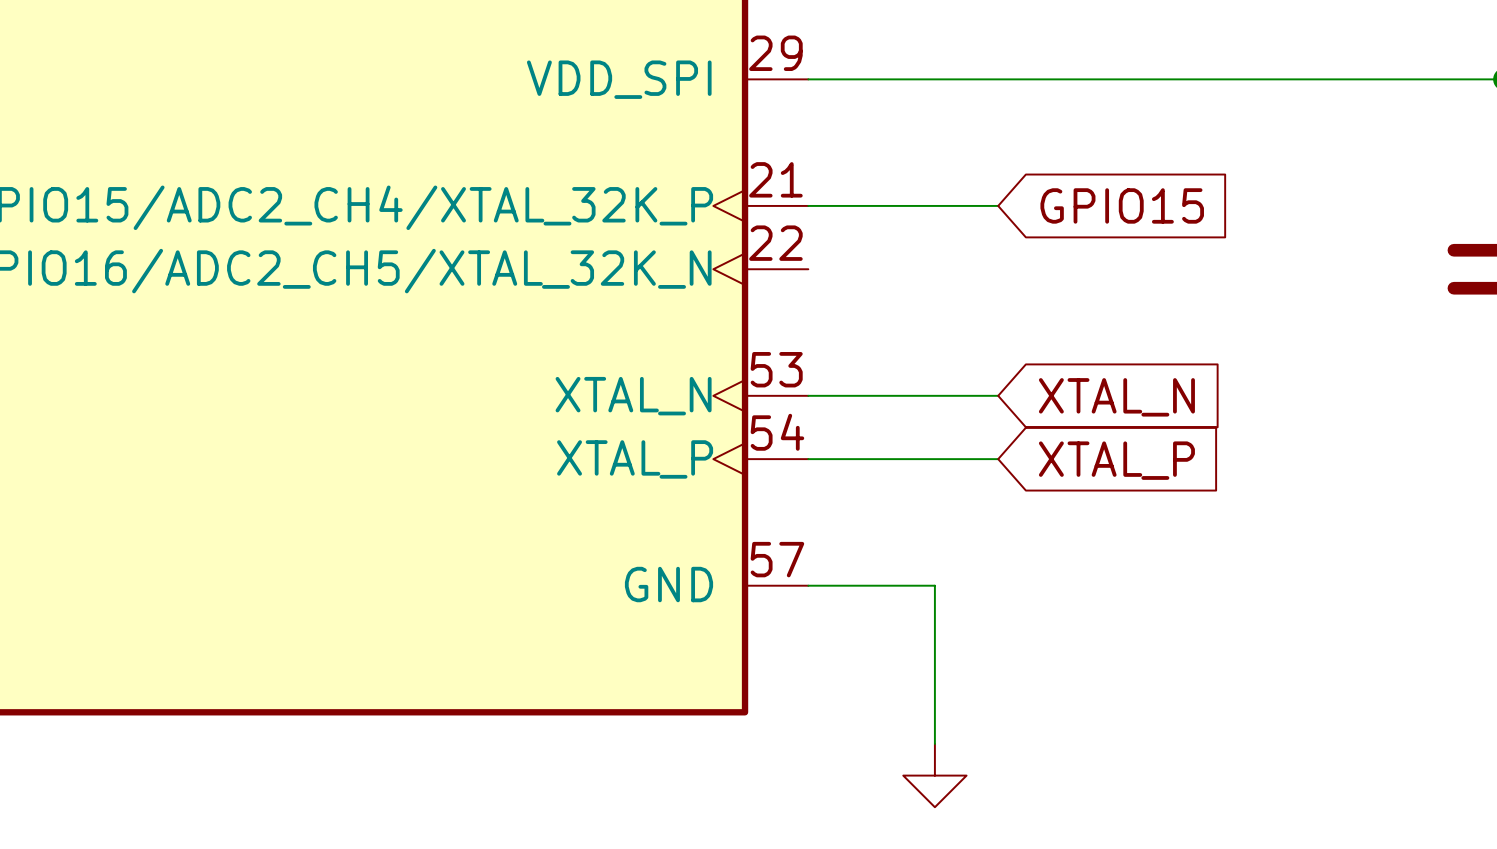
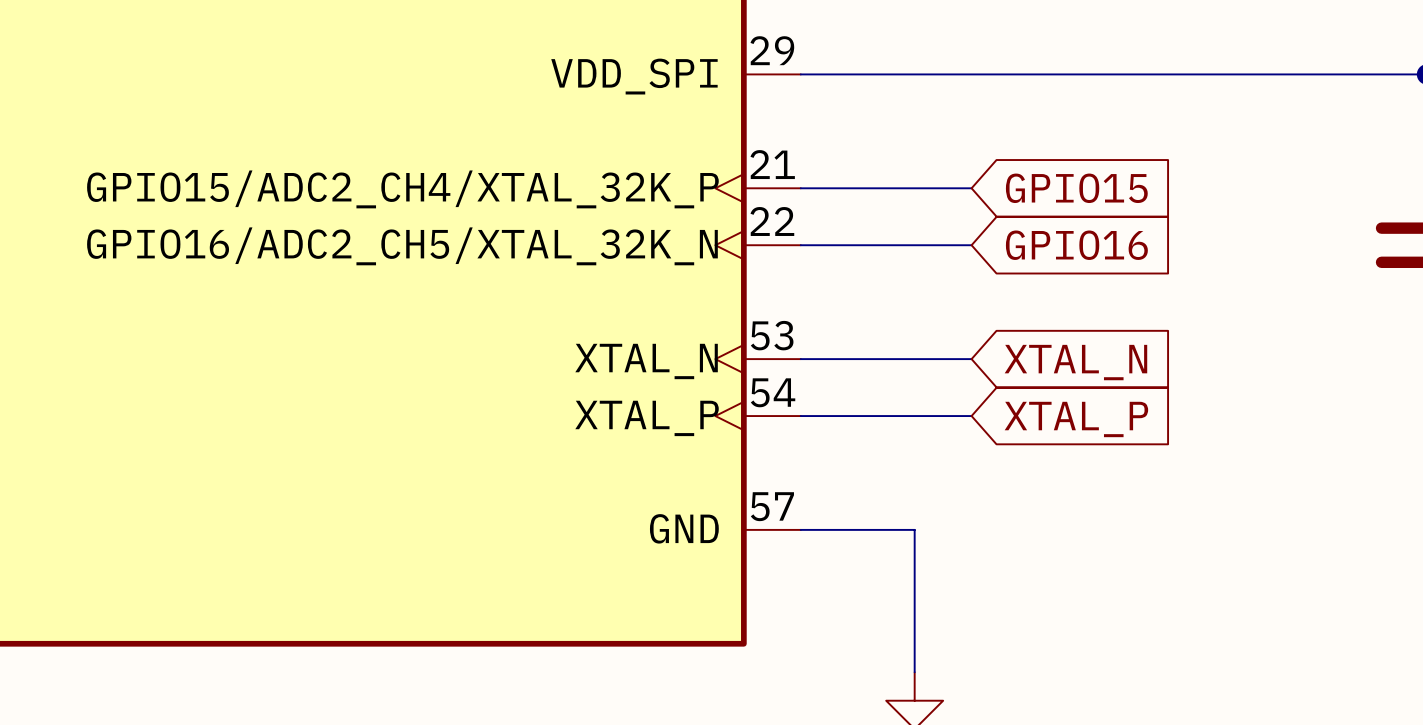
wire: none -> (800, 245) (971, 245)
global label: none -> GPIO16 (1076, 245)

